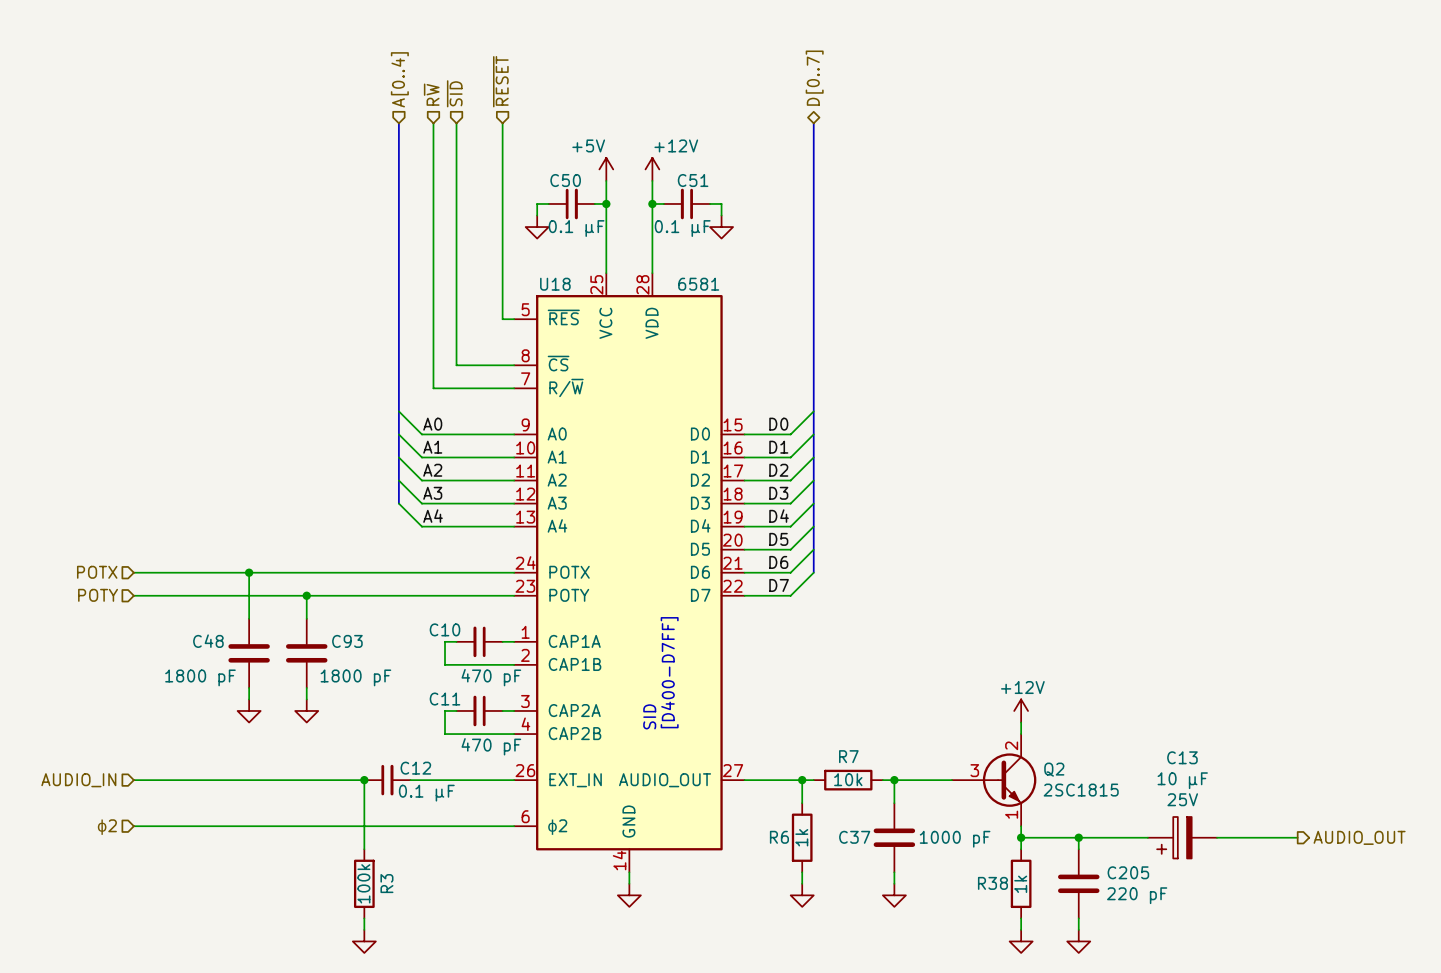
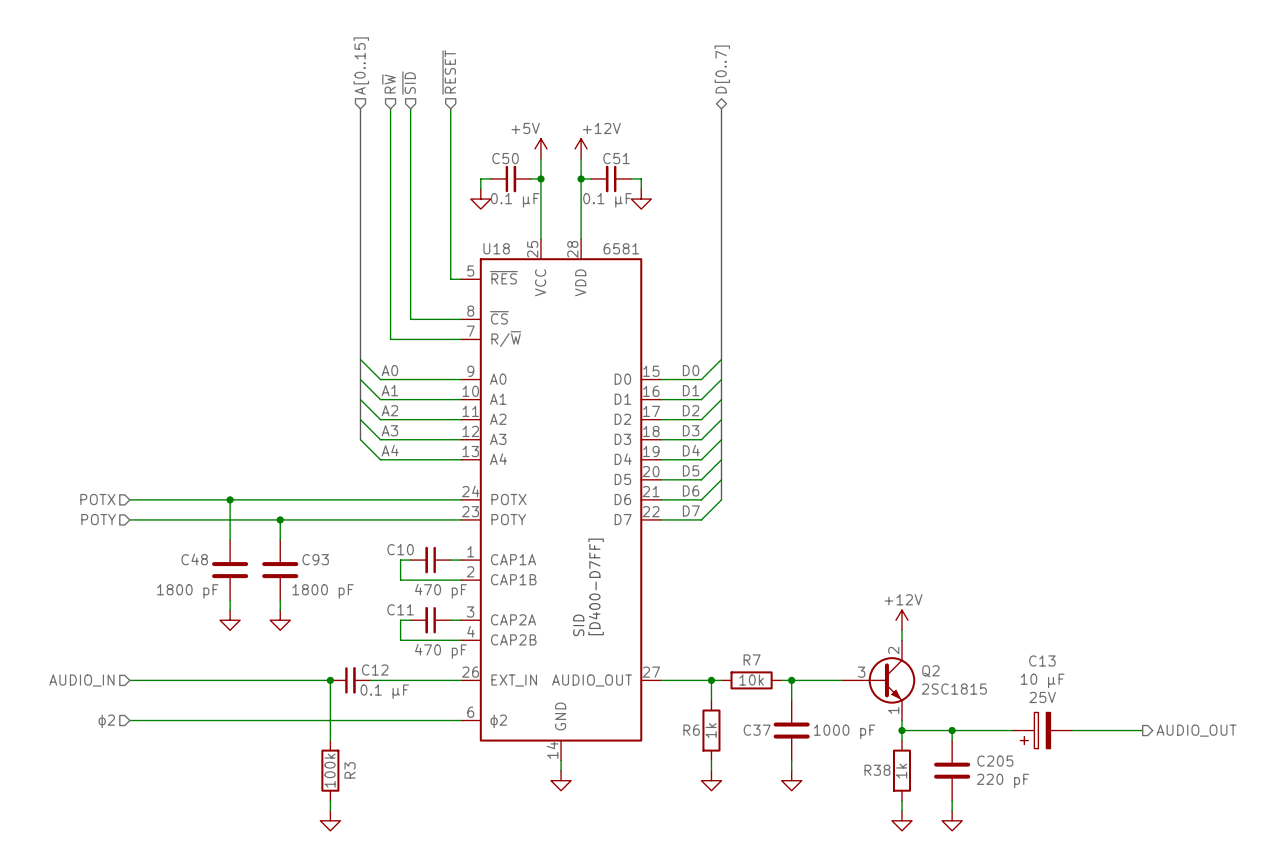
hierarchical label: A[0..4] (399, 79) -> A[0..15] (361, 66)

